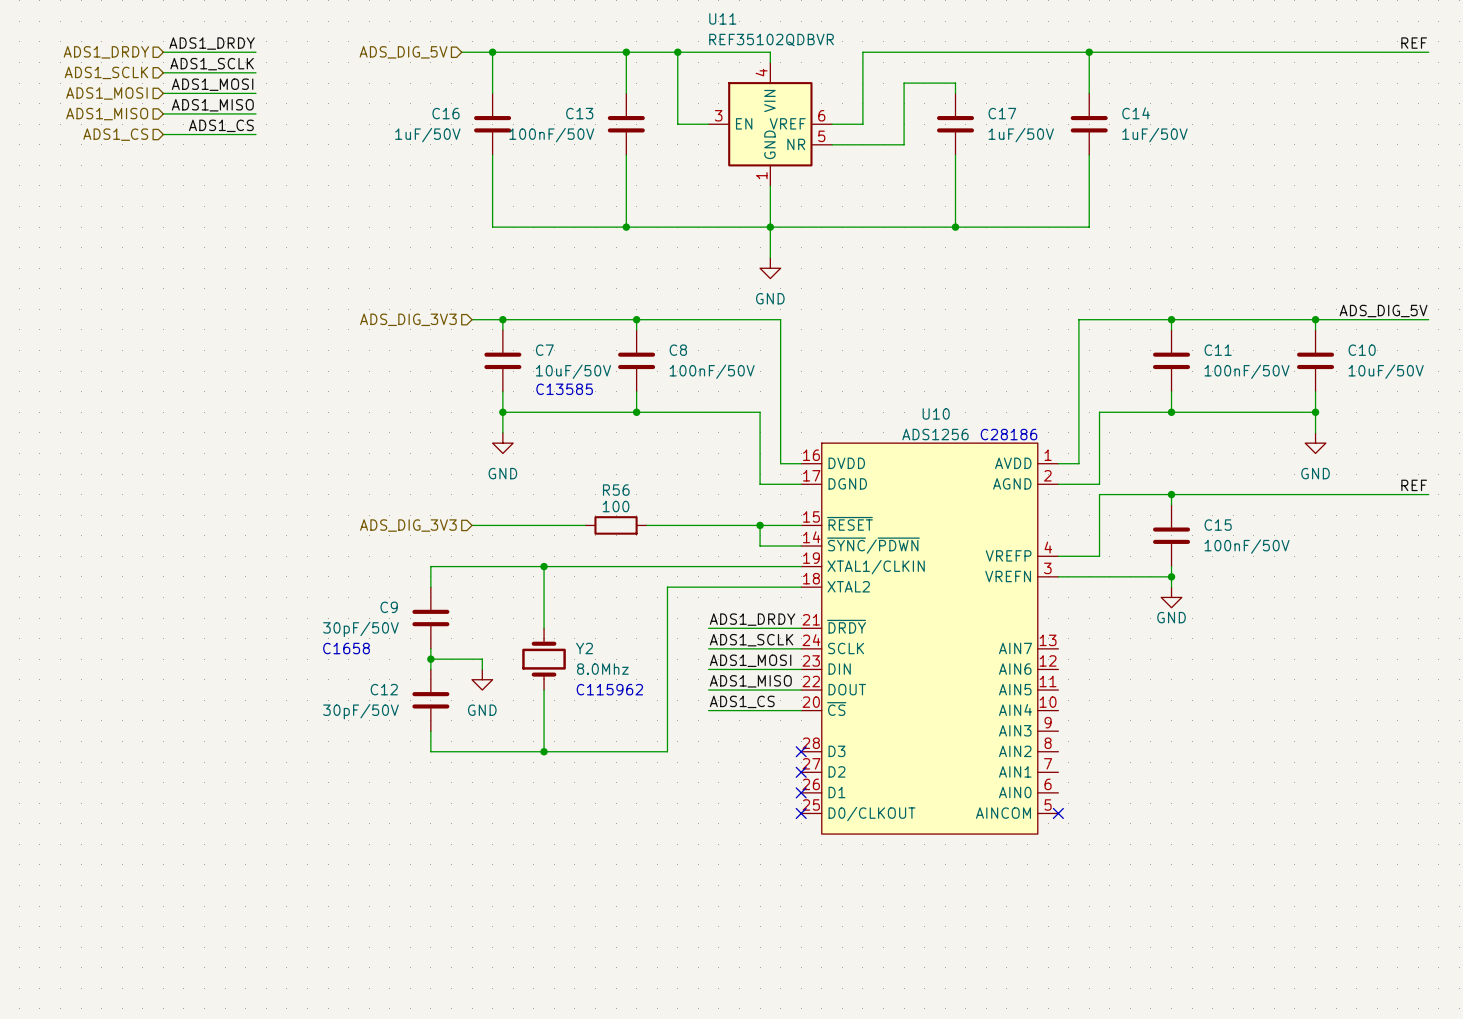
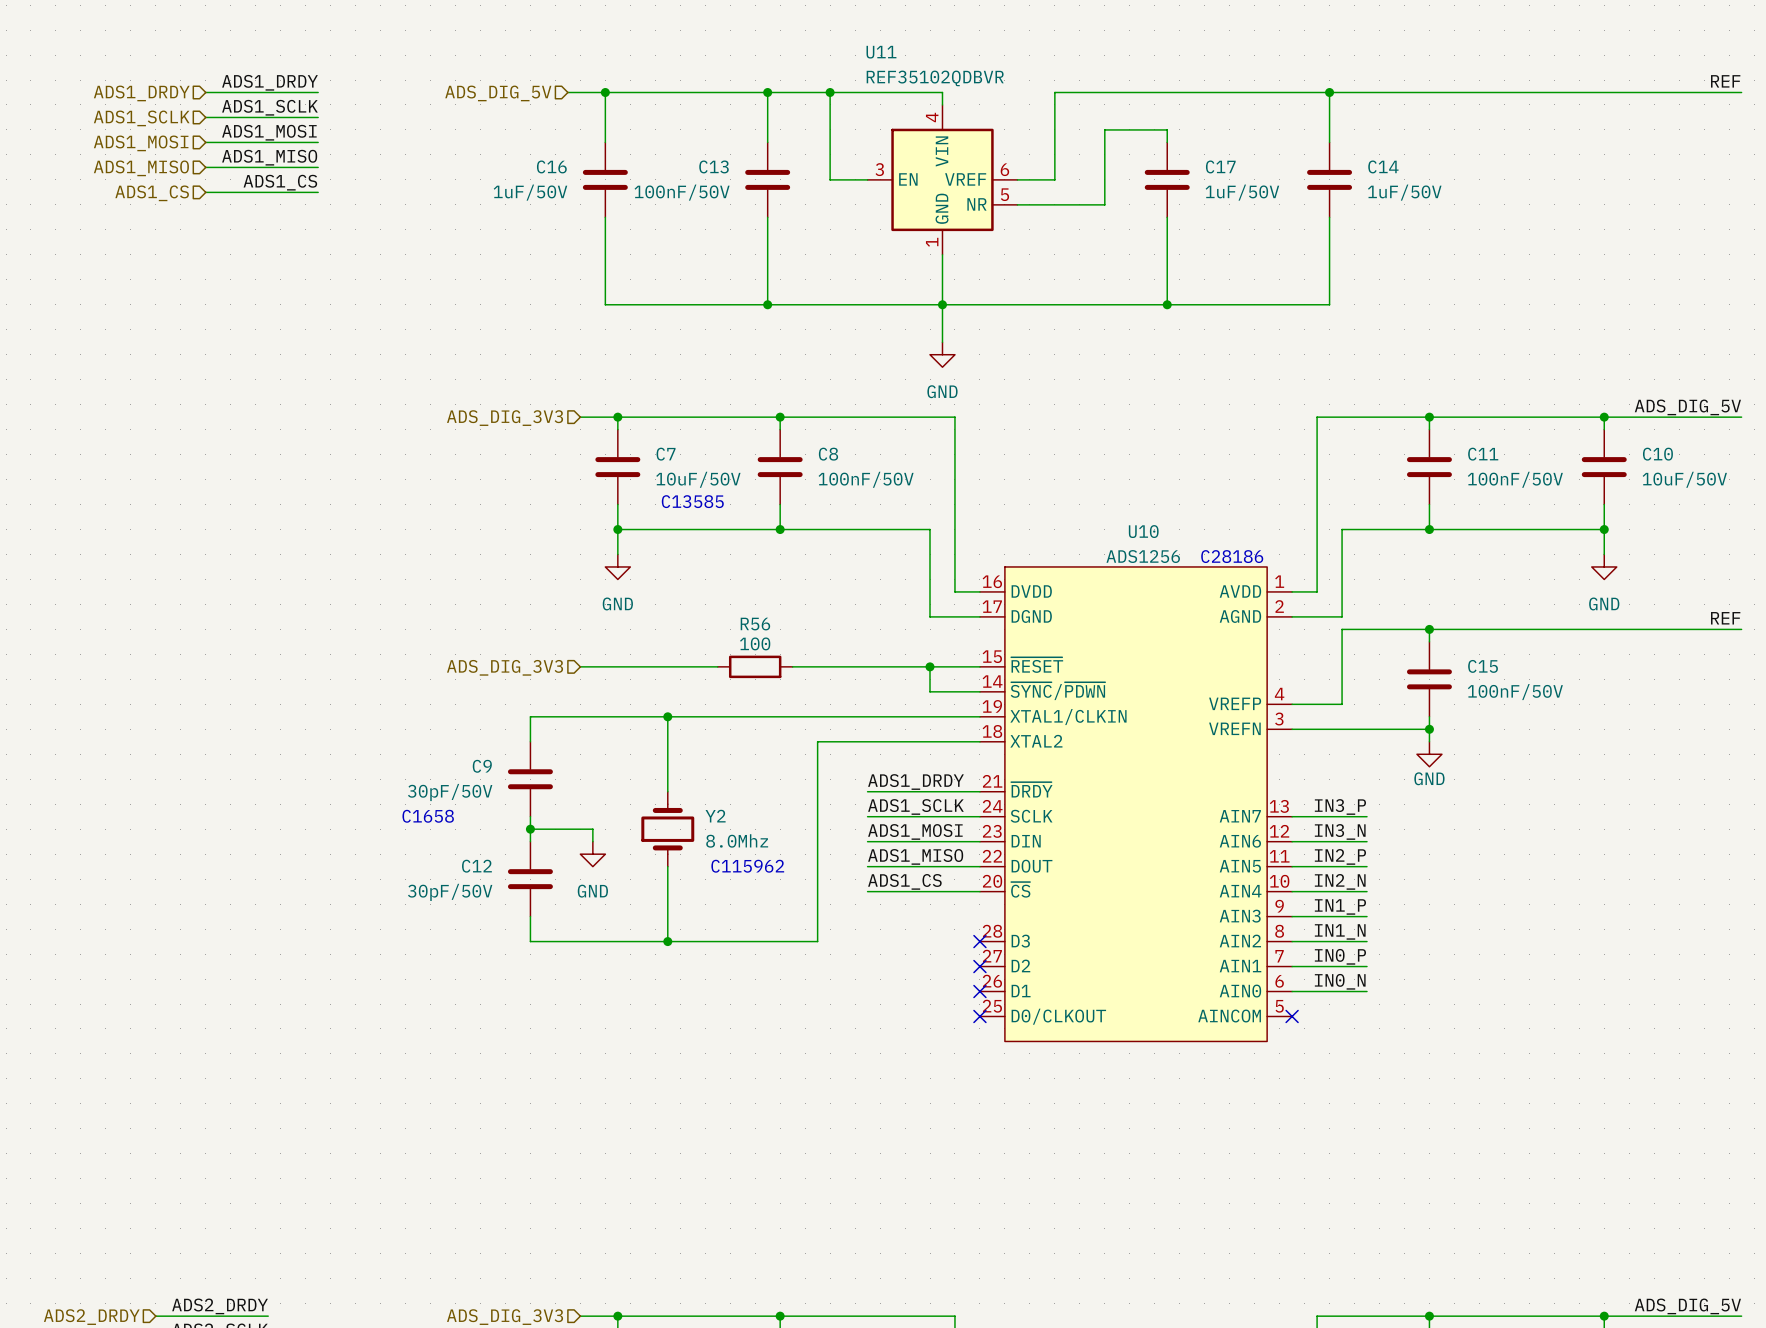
label: none -> IN3_P (1340, 806)
wire: none -> (1292, 816) (1367, 816)
label: none -> IN3_N (1340, 831)
wire: none -> (1292, 841) (1367, 841)
label: none -> IN2_P (1340, 856)
wire: none -> (1292, 866) (1367, 866)
label: none -> IN2_N (1340, 881)
wire: none -> (1292, 891) (1367, 891)
label: none -> IN1_P (1340, 906)
wire: none -> (1292, 916) (1367, 916)
label: none -> IN1_N (1340, 931)
wire: none -> (1292, 941) (1367, 941)
label: none -> IN0_P (1340, 956)
wire: none -> (1292, 966) (1367, 966)
label: none -> IN0_N (1340, 981)
wire: none -> (1292, 991) (1367, 991)

